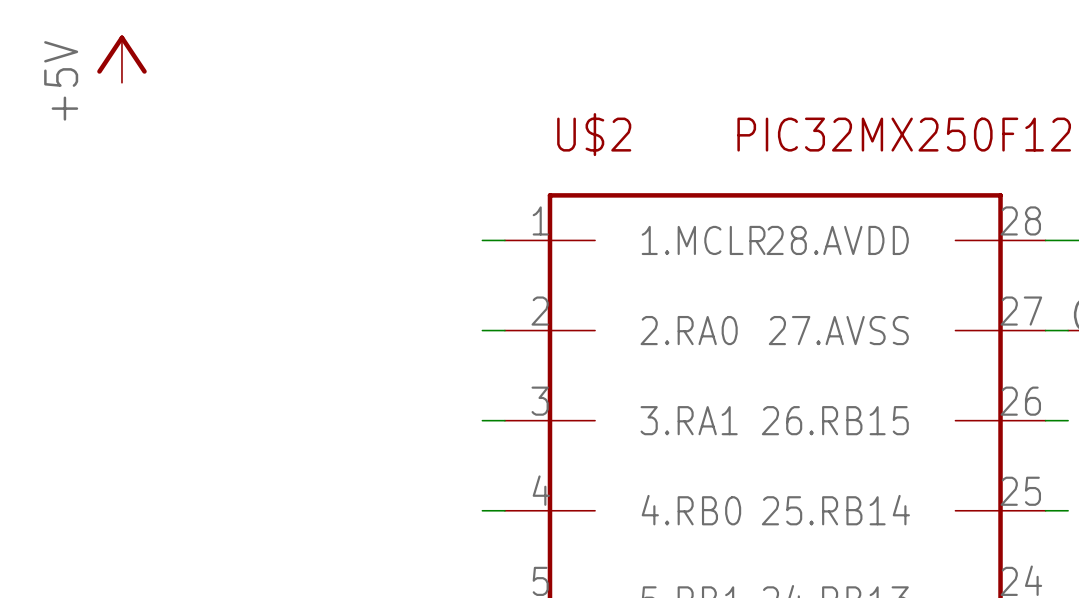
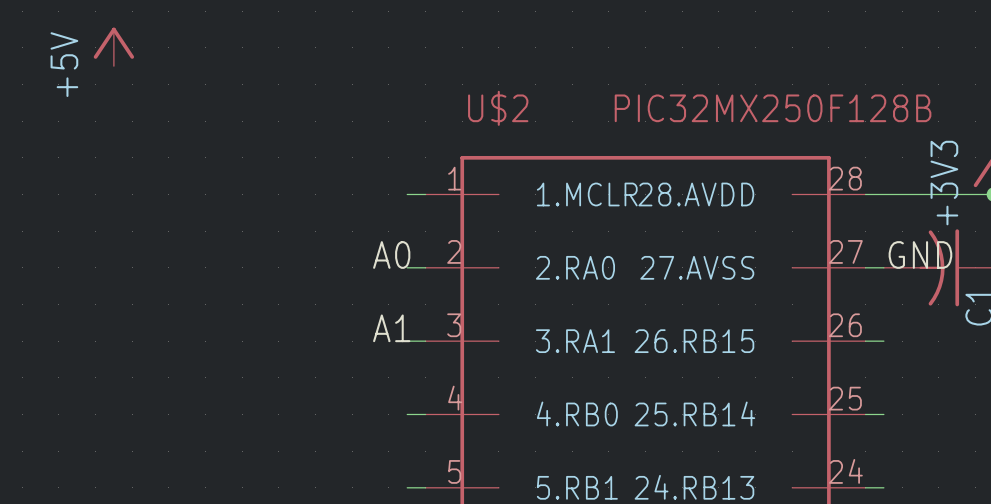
label: none -> A0 (391, 254)
label: none -> A1 (391, 328)

